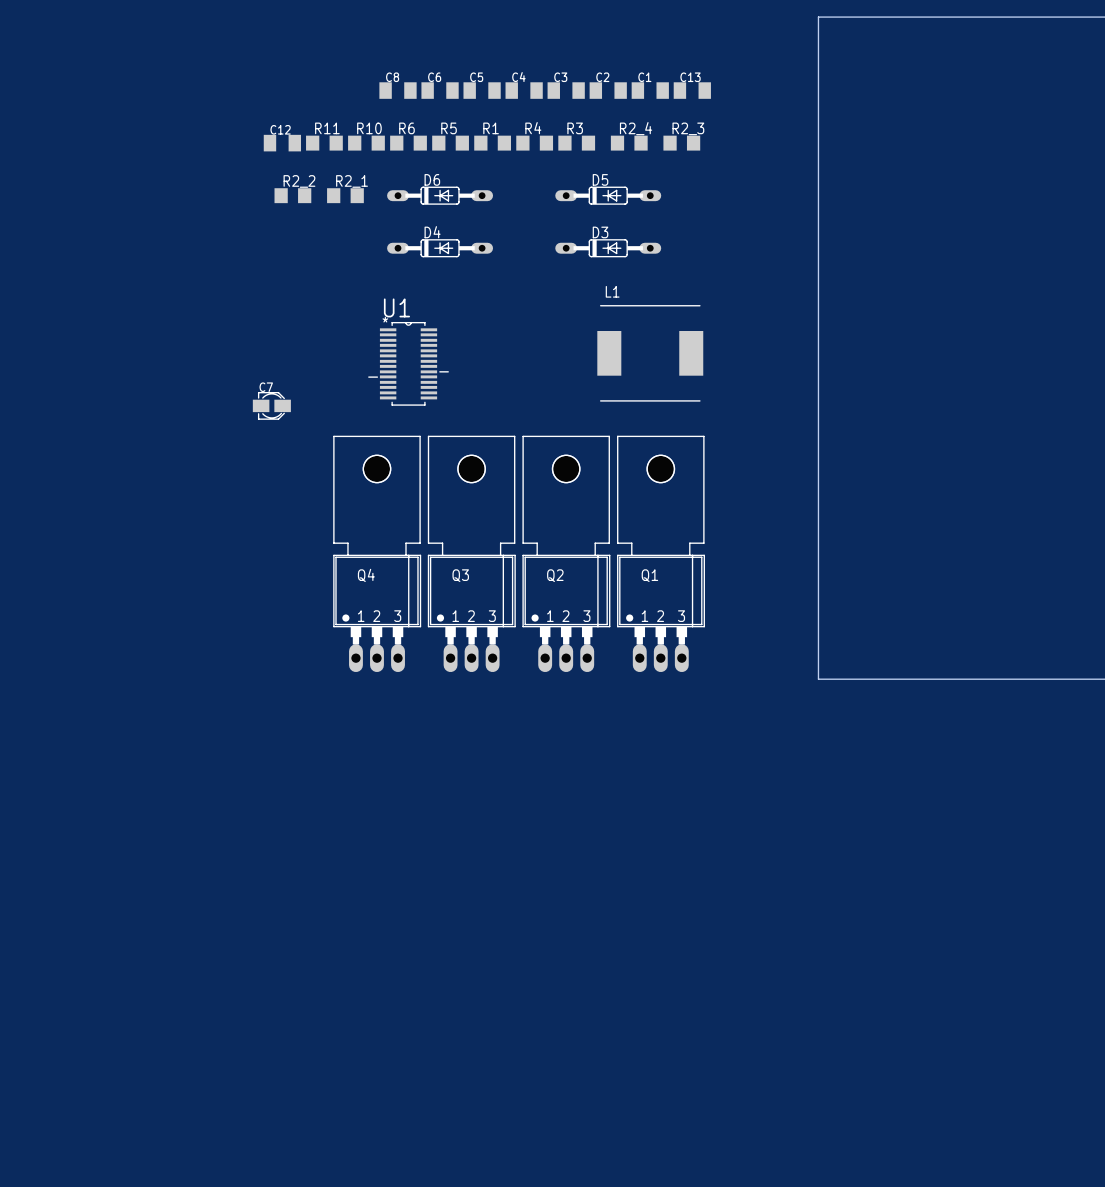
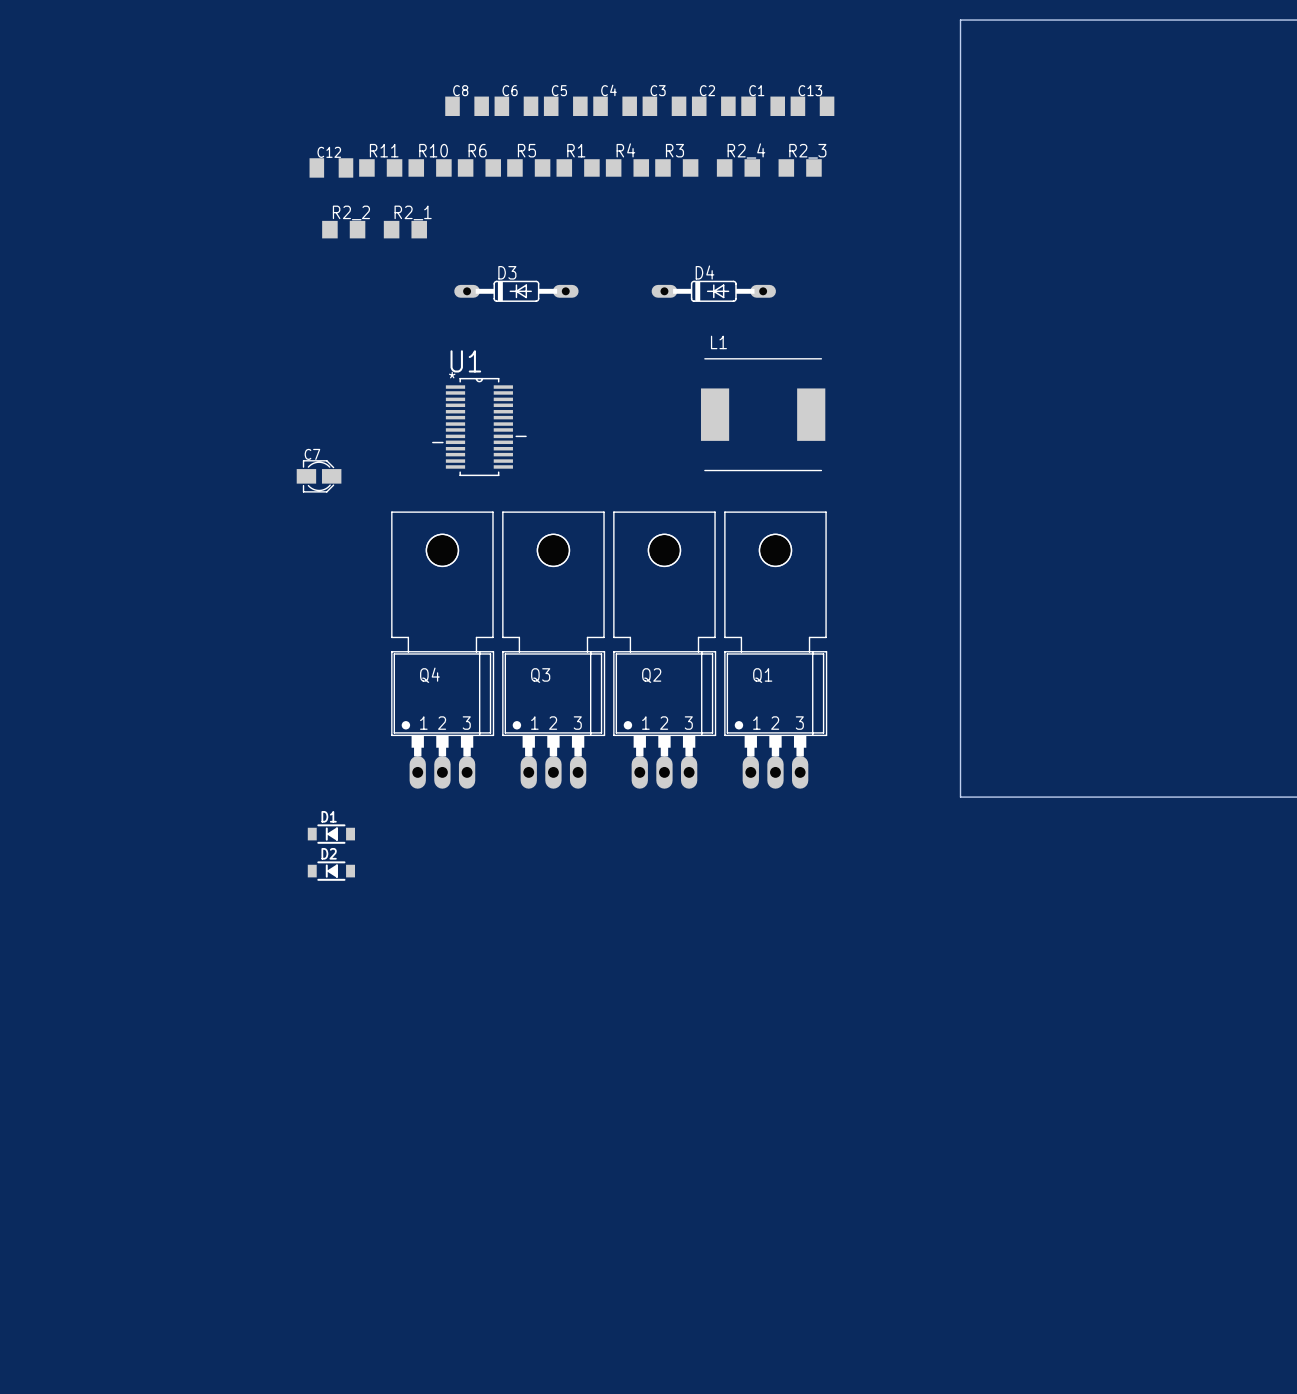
D6: (440, 195) -> none
D5: (608, 195) -> none
D4 name: D4 (432, 232) -> D3 (507, 272)
D3 name: D3 (600, 232) -> D4 (705, 272)
D1: none -> (331, 834)
D2: none -> (331, 871)

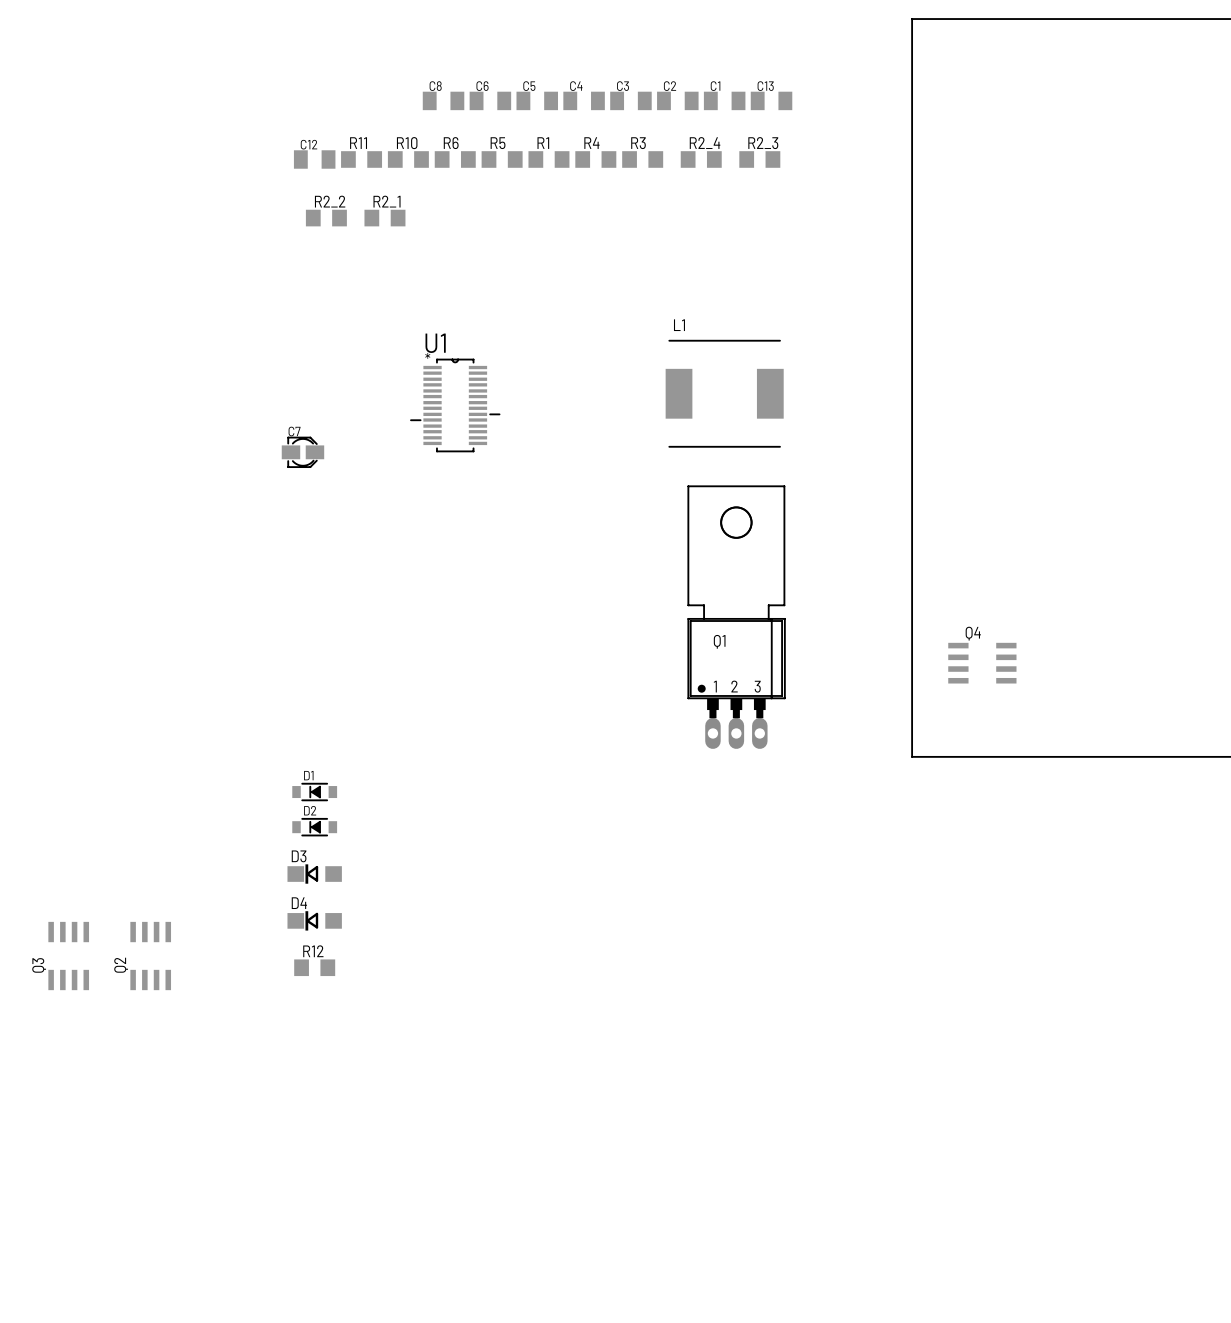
D3 footprint: [454, 280, 579, 302] -> [287, 864, 342, 884]
D4 footprint: [651, 280, 776, 302] -> [287, 911, 342, 931]
Q4 footprint: [391, 511, 495, 789] -> [948, 642, 1017, 684]
Q3 footprint: [502, 511, 606, 789] -> [48, 921, 90, 991]
Q2 footprint: [613, 511, 717, 789] -> [130, 921, 172, 991]
Q4 name position: Q4 (429, 675) -> Q4 (973, 633)
Q3 name position: Q3 (540, 675) -> Q3 (39, 965)
Q2 name position: Q2 (651, 675) -> Q2 (121, 965)
R12: none -> (314, 967)

